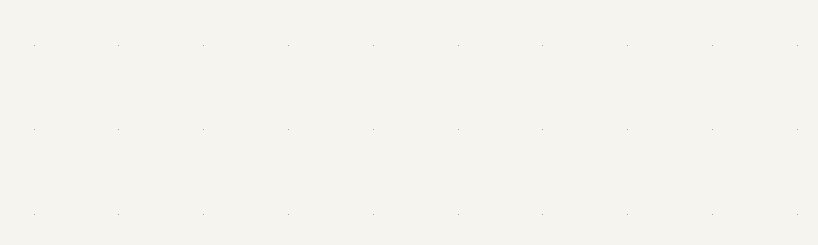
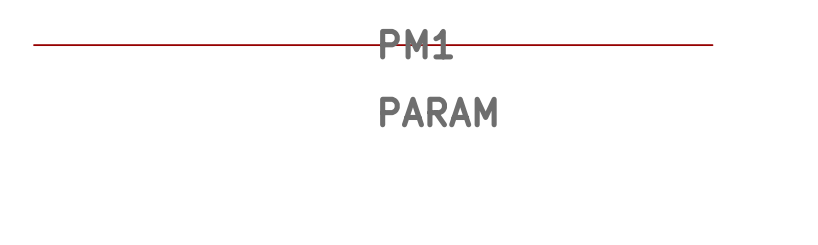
PM1: none -> PARAM (373, 45)

